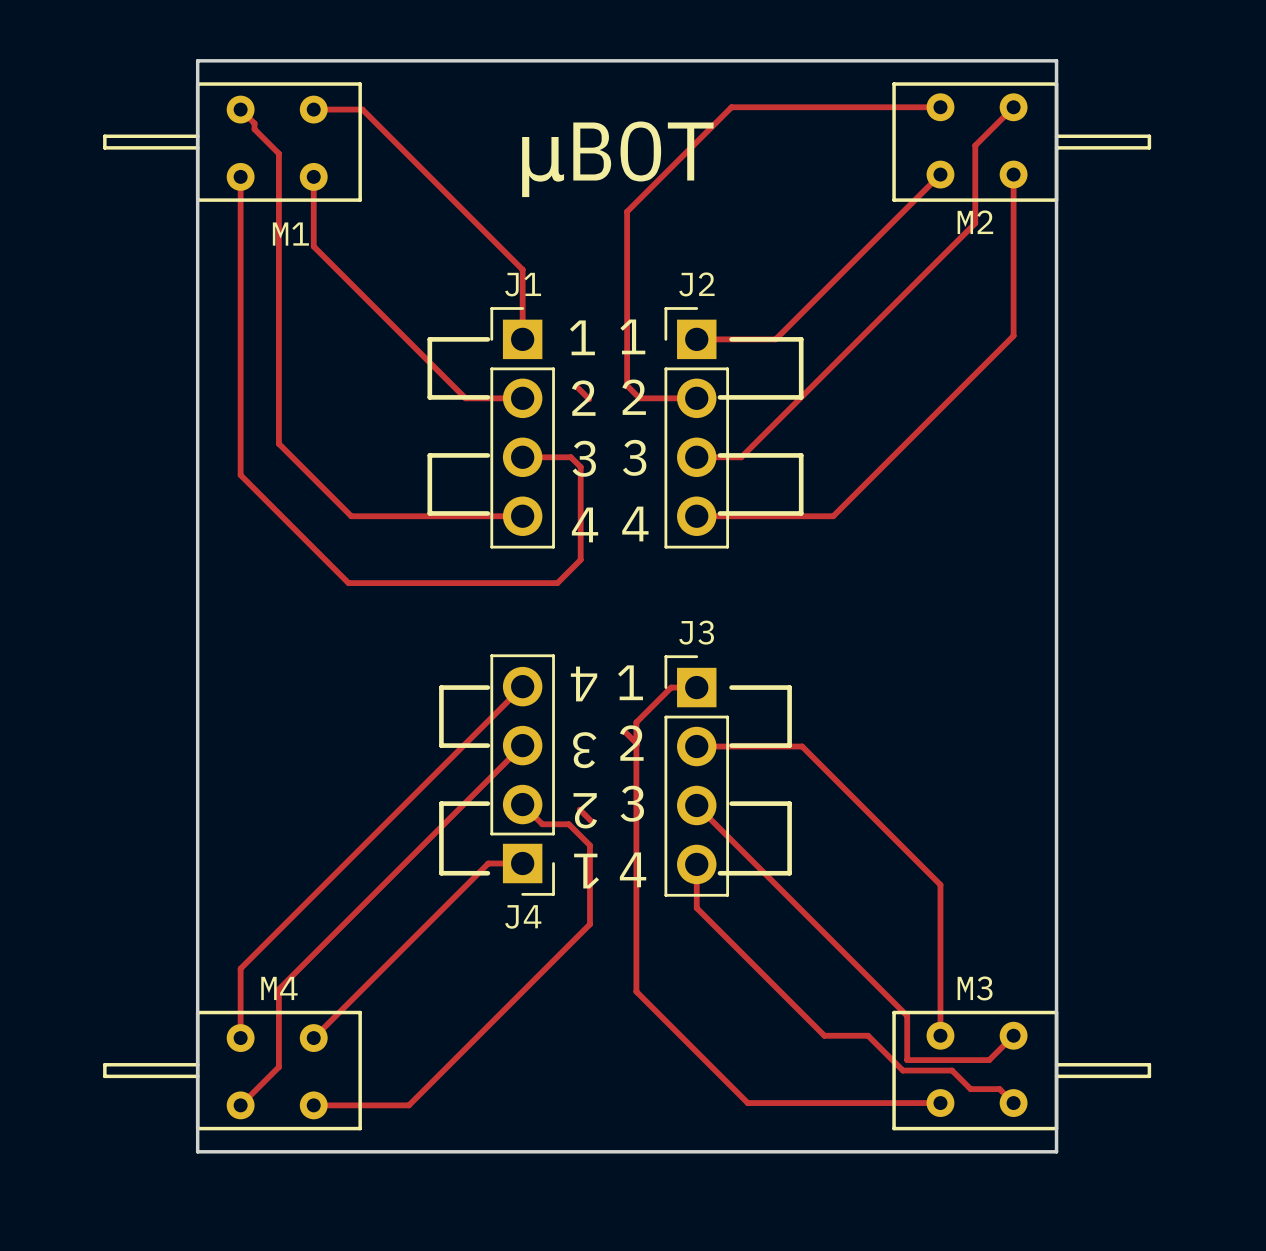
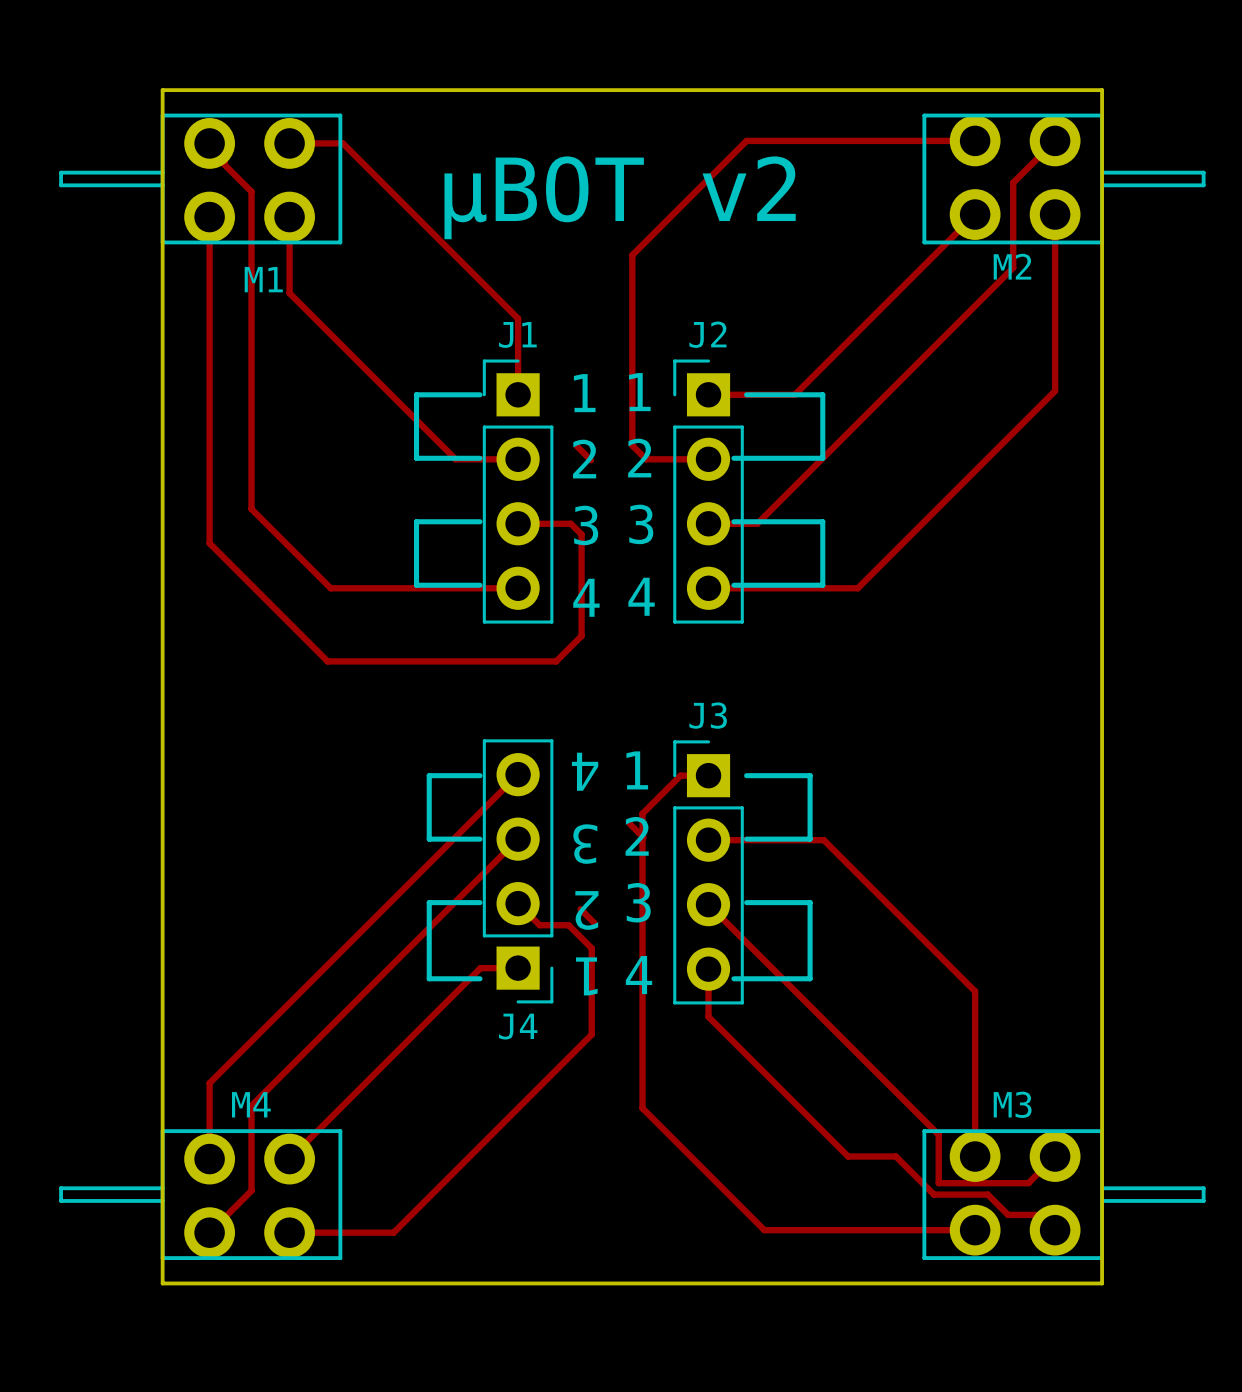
M1 footprint: [103, 82, 362, 202] -> [59, 113, 343, 245]
M2 footprint: [892, 82, 1152, 202] -> [922, 113, 1206, 245]
text: μBOT (617, 159) -> μBOT v2 (620, 197)
M4 footprint: [103, 1010, 362, 1131] -> [59, 1129, 343, 1260]
M3 footprint: [892, 1010, 1152, 1131] -> [922, 1129, 1206, 1260]

